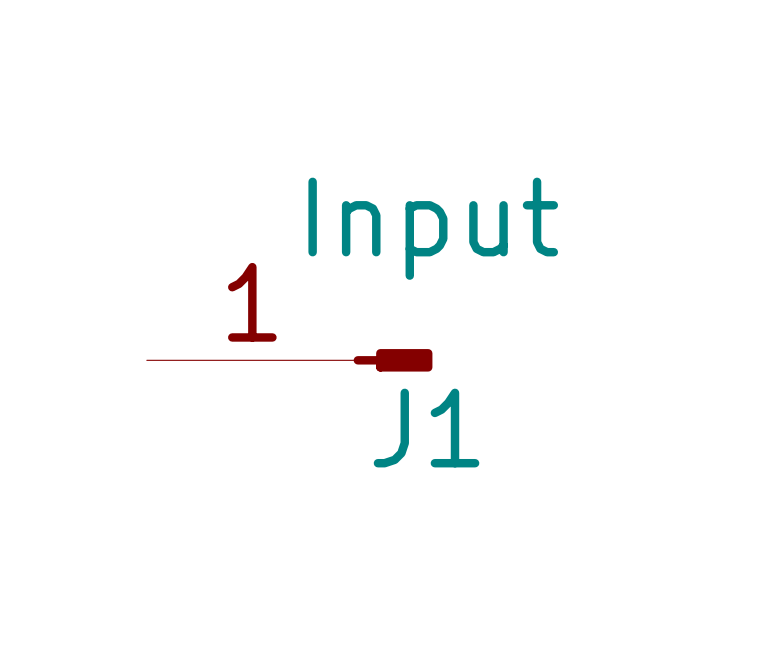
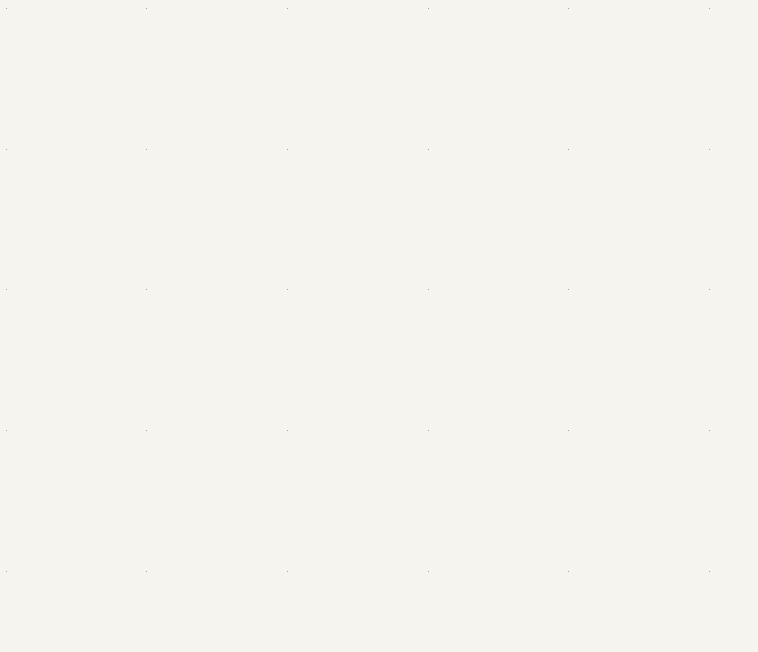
J1: Input (289, 360) -> none

